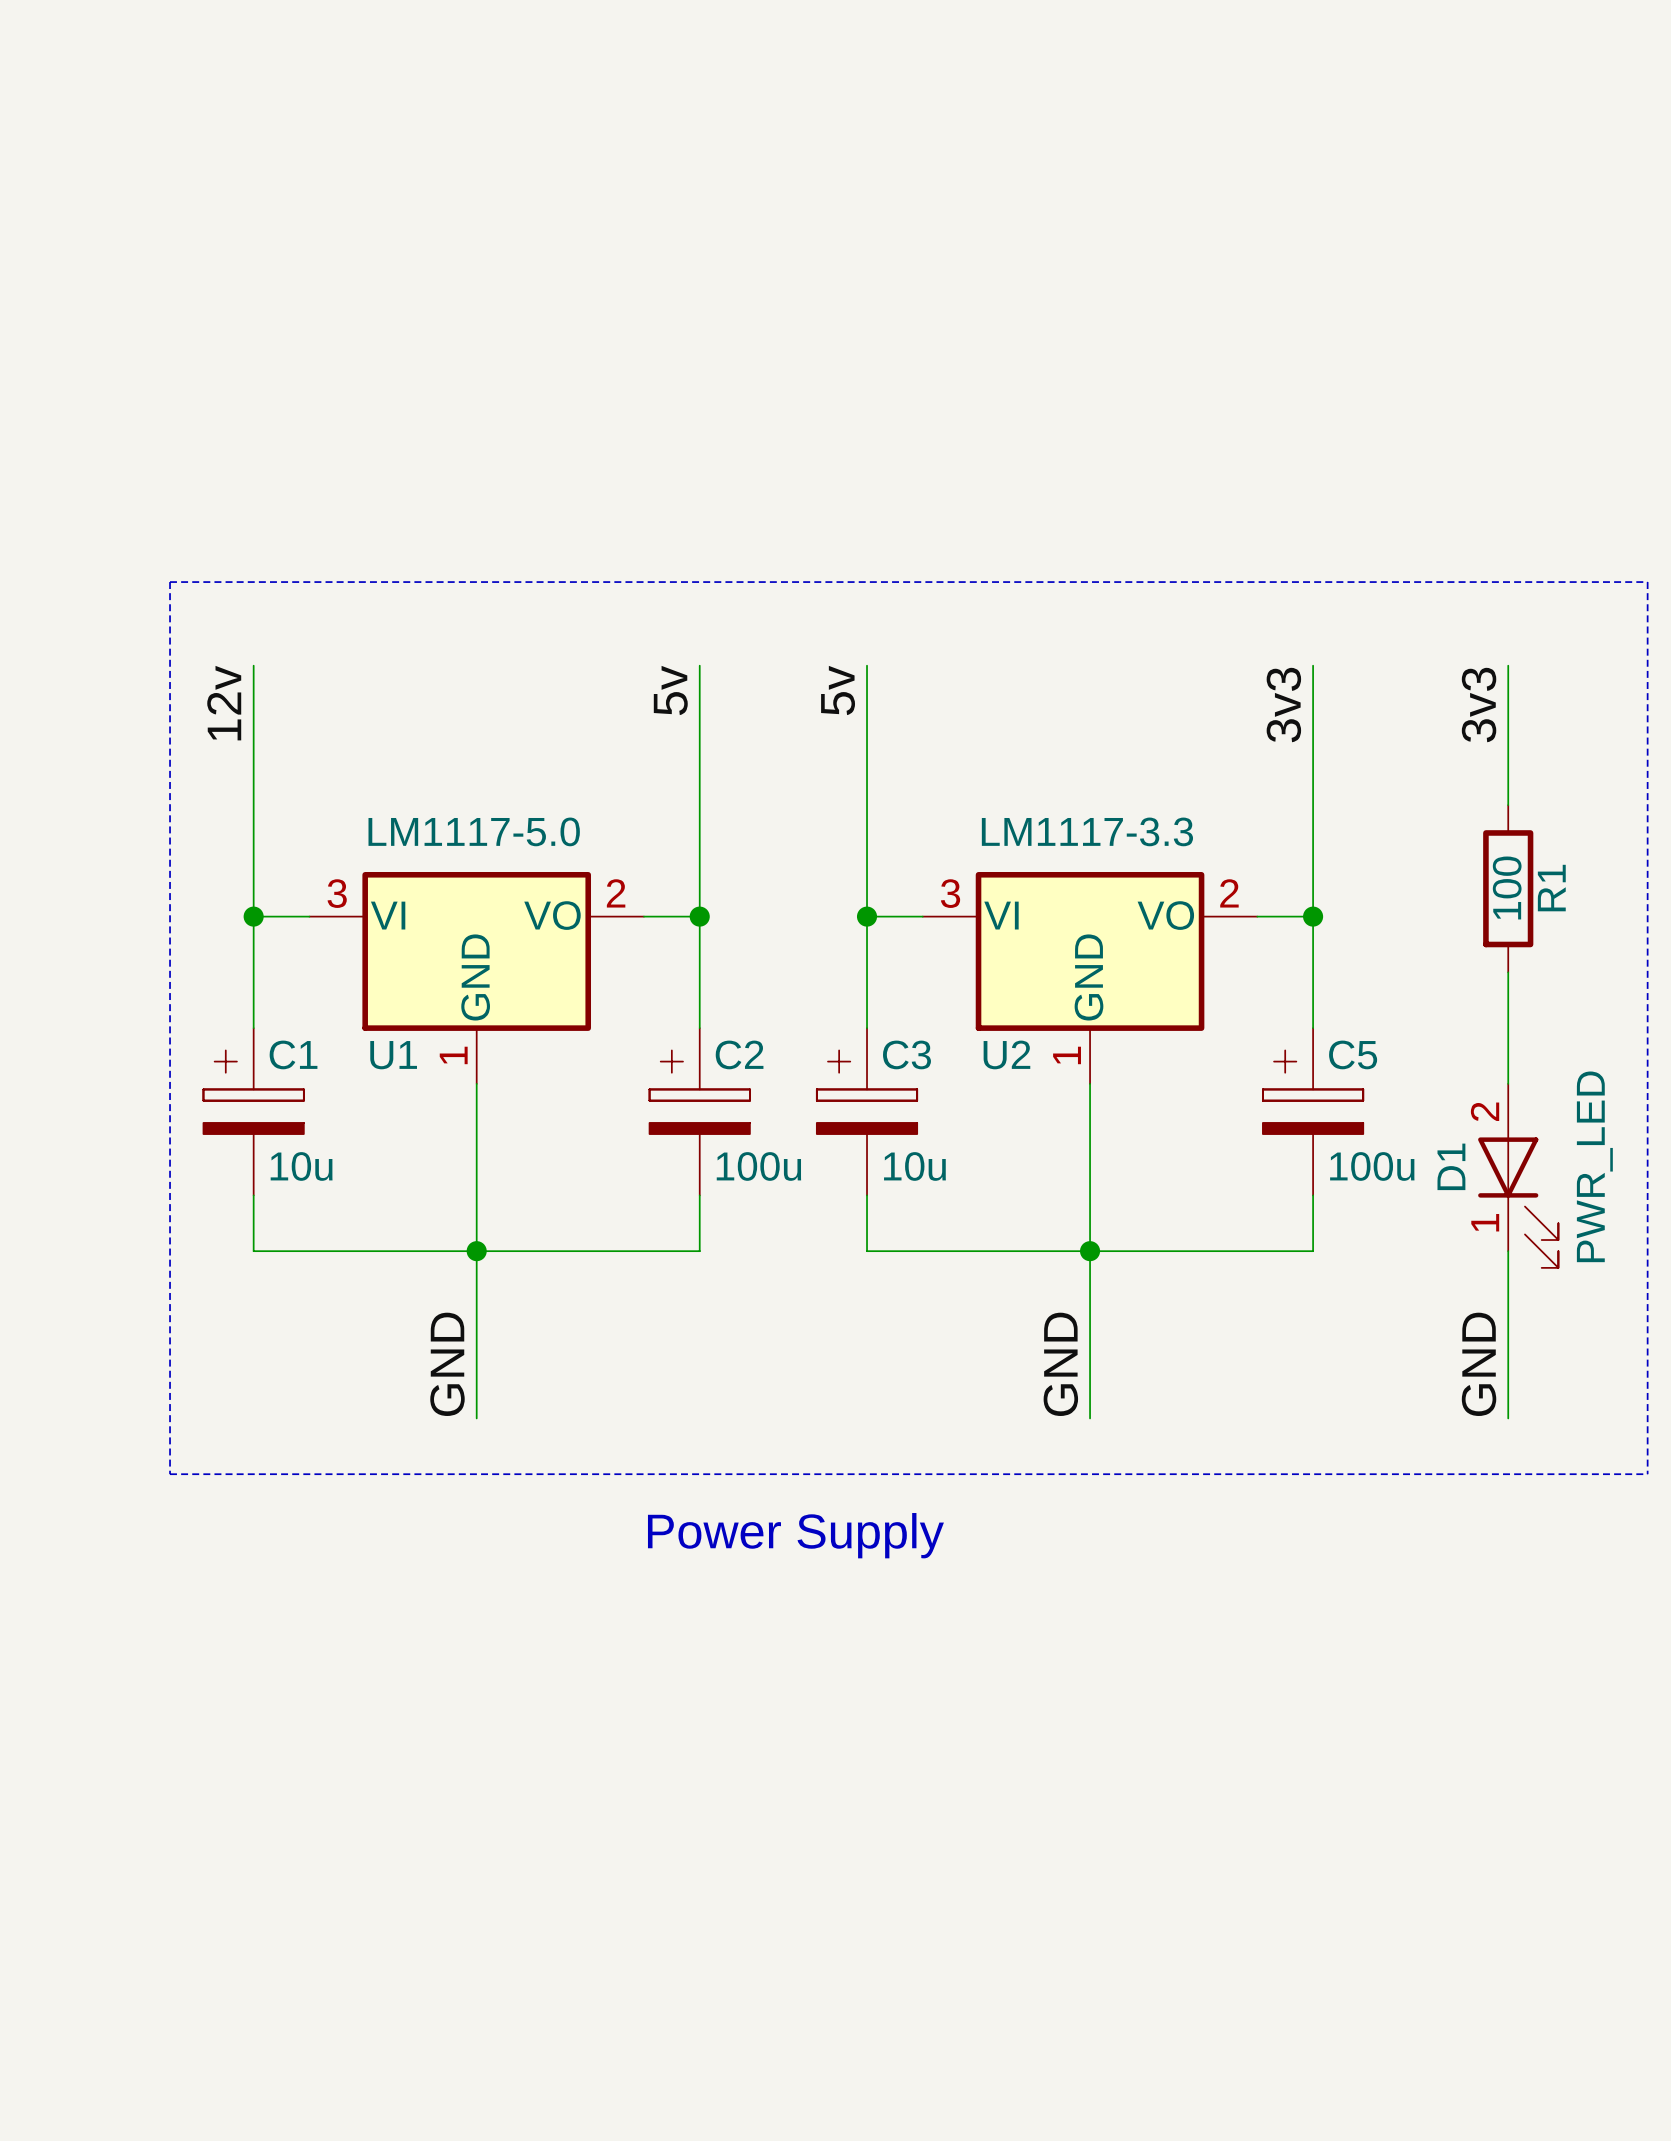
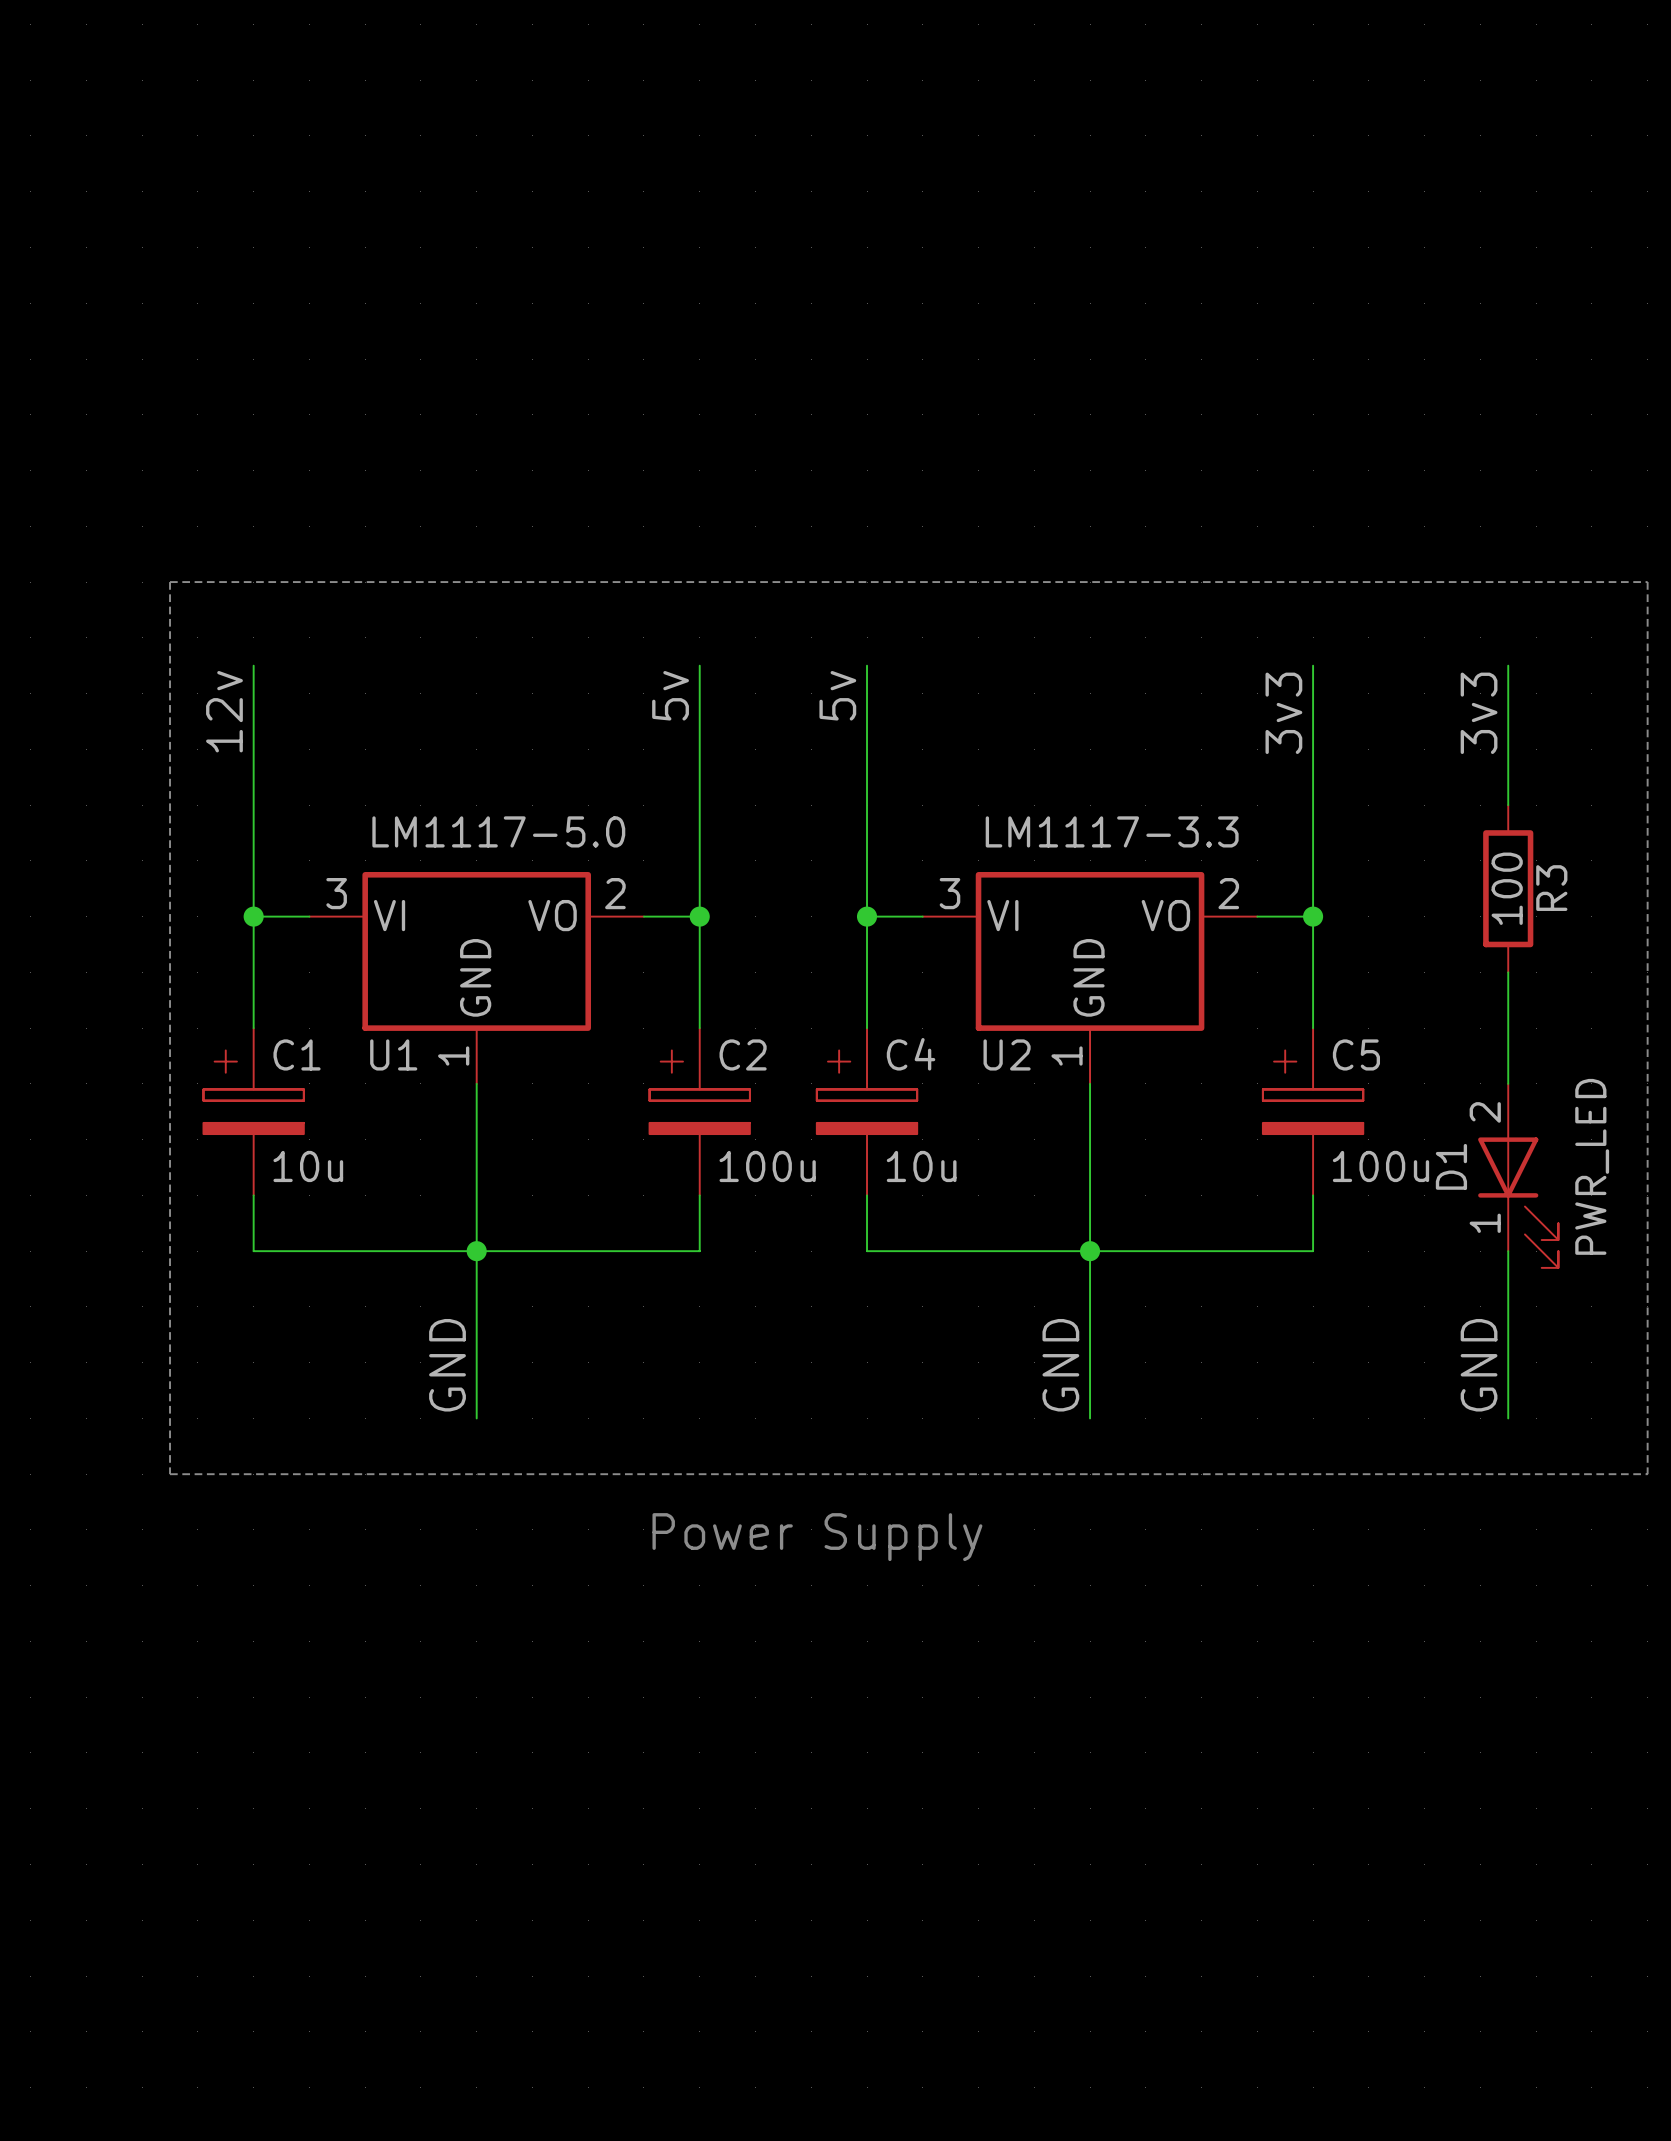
R1 name: R1 (1551, 888) -> R3 (1551, 888)
C3 name: C3 (906, 1054) -> C4 (911, 1054)

